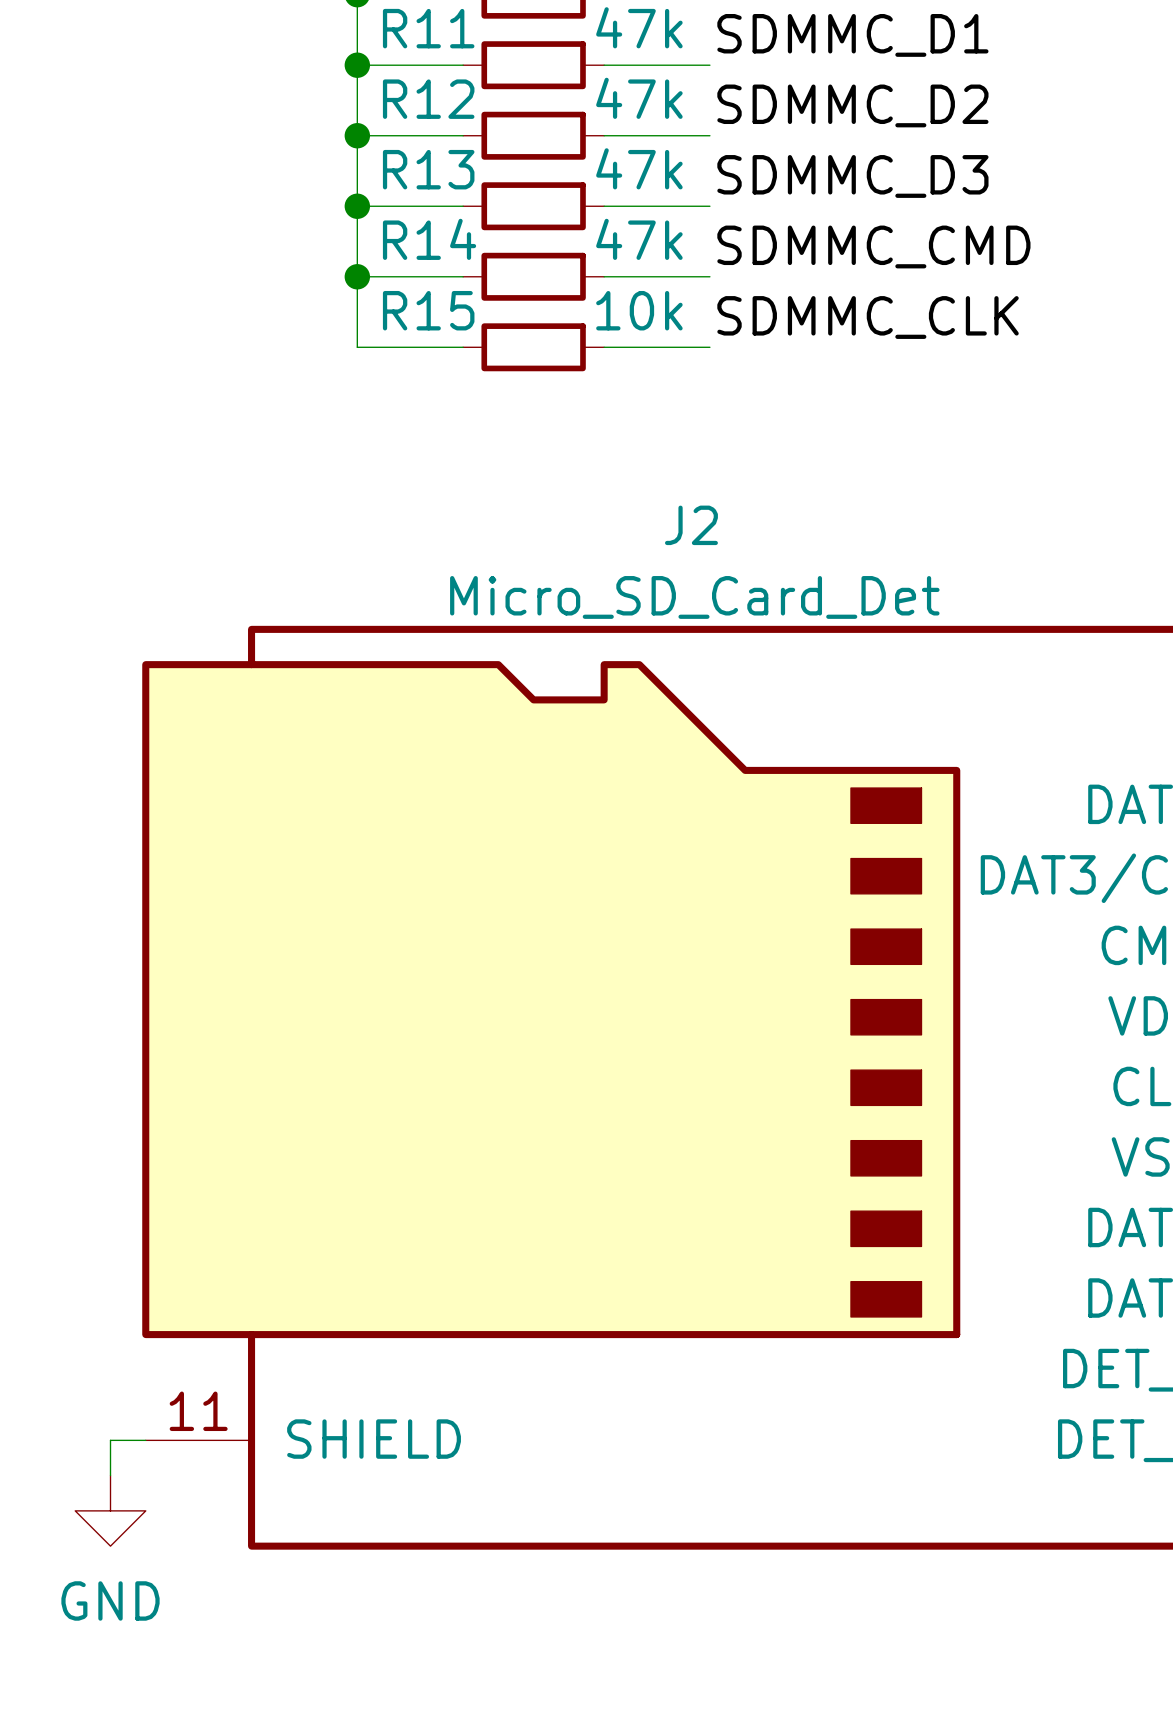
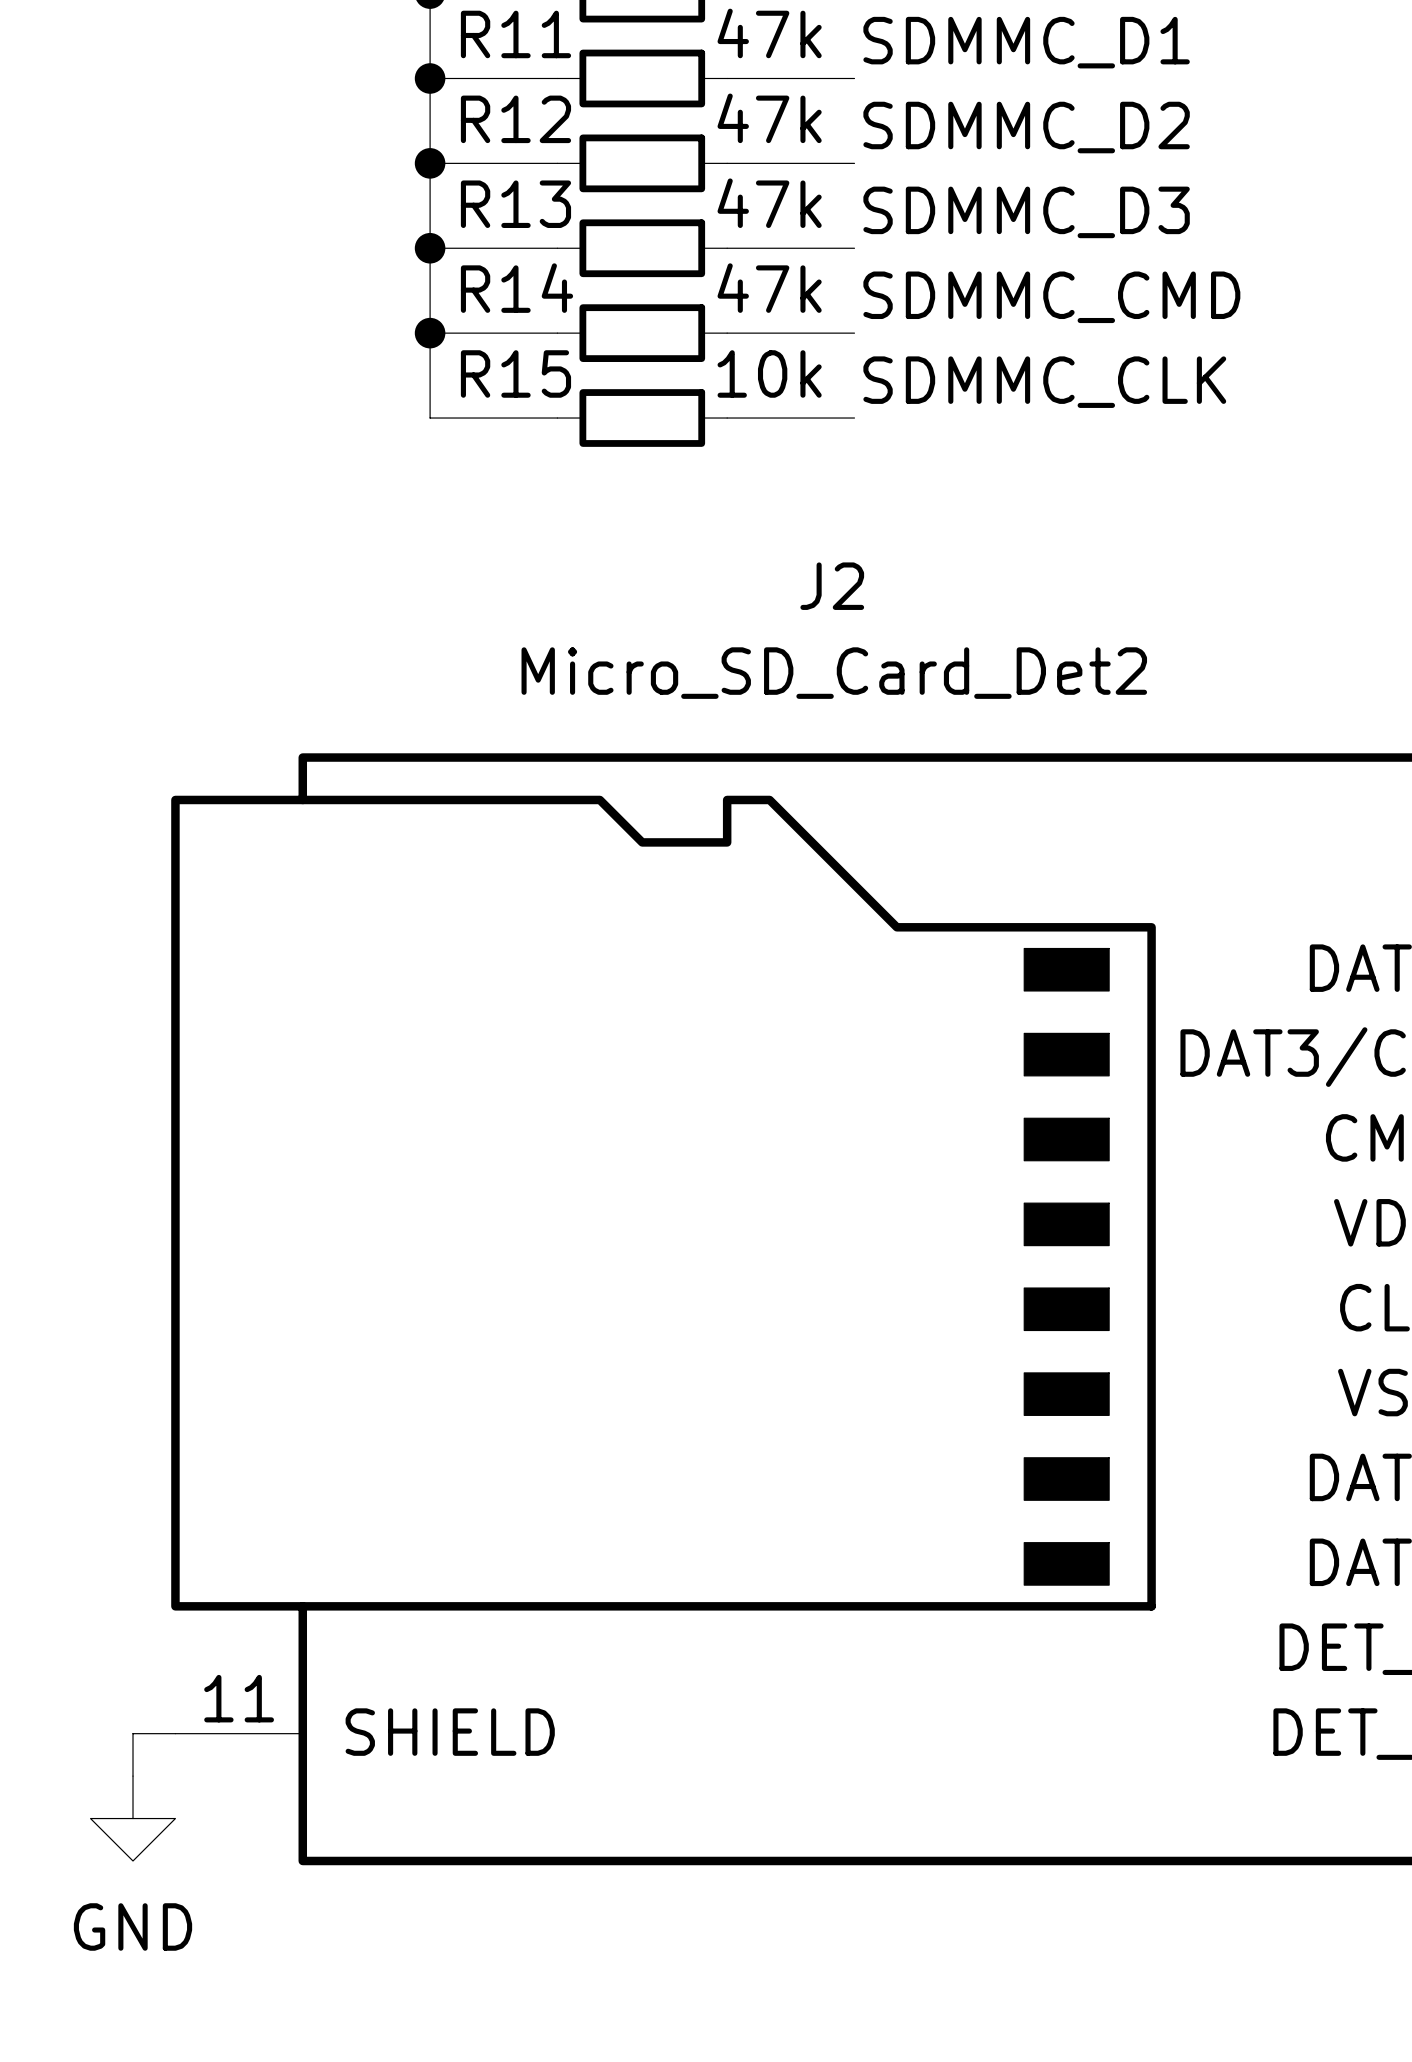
J2 name position: J2 (691, 525) -> J2 (832, 586)
J2 value: Micro_SD_Card_Det (694, 597) -> Micro_SD_Card_Det2 (834, 673)

